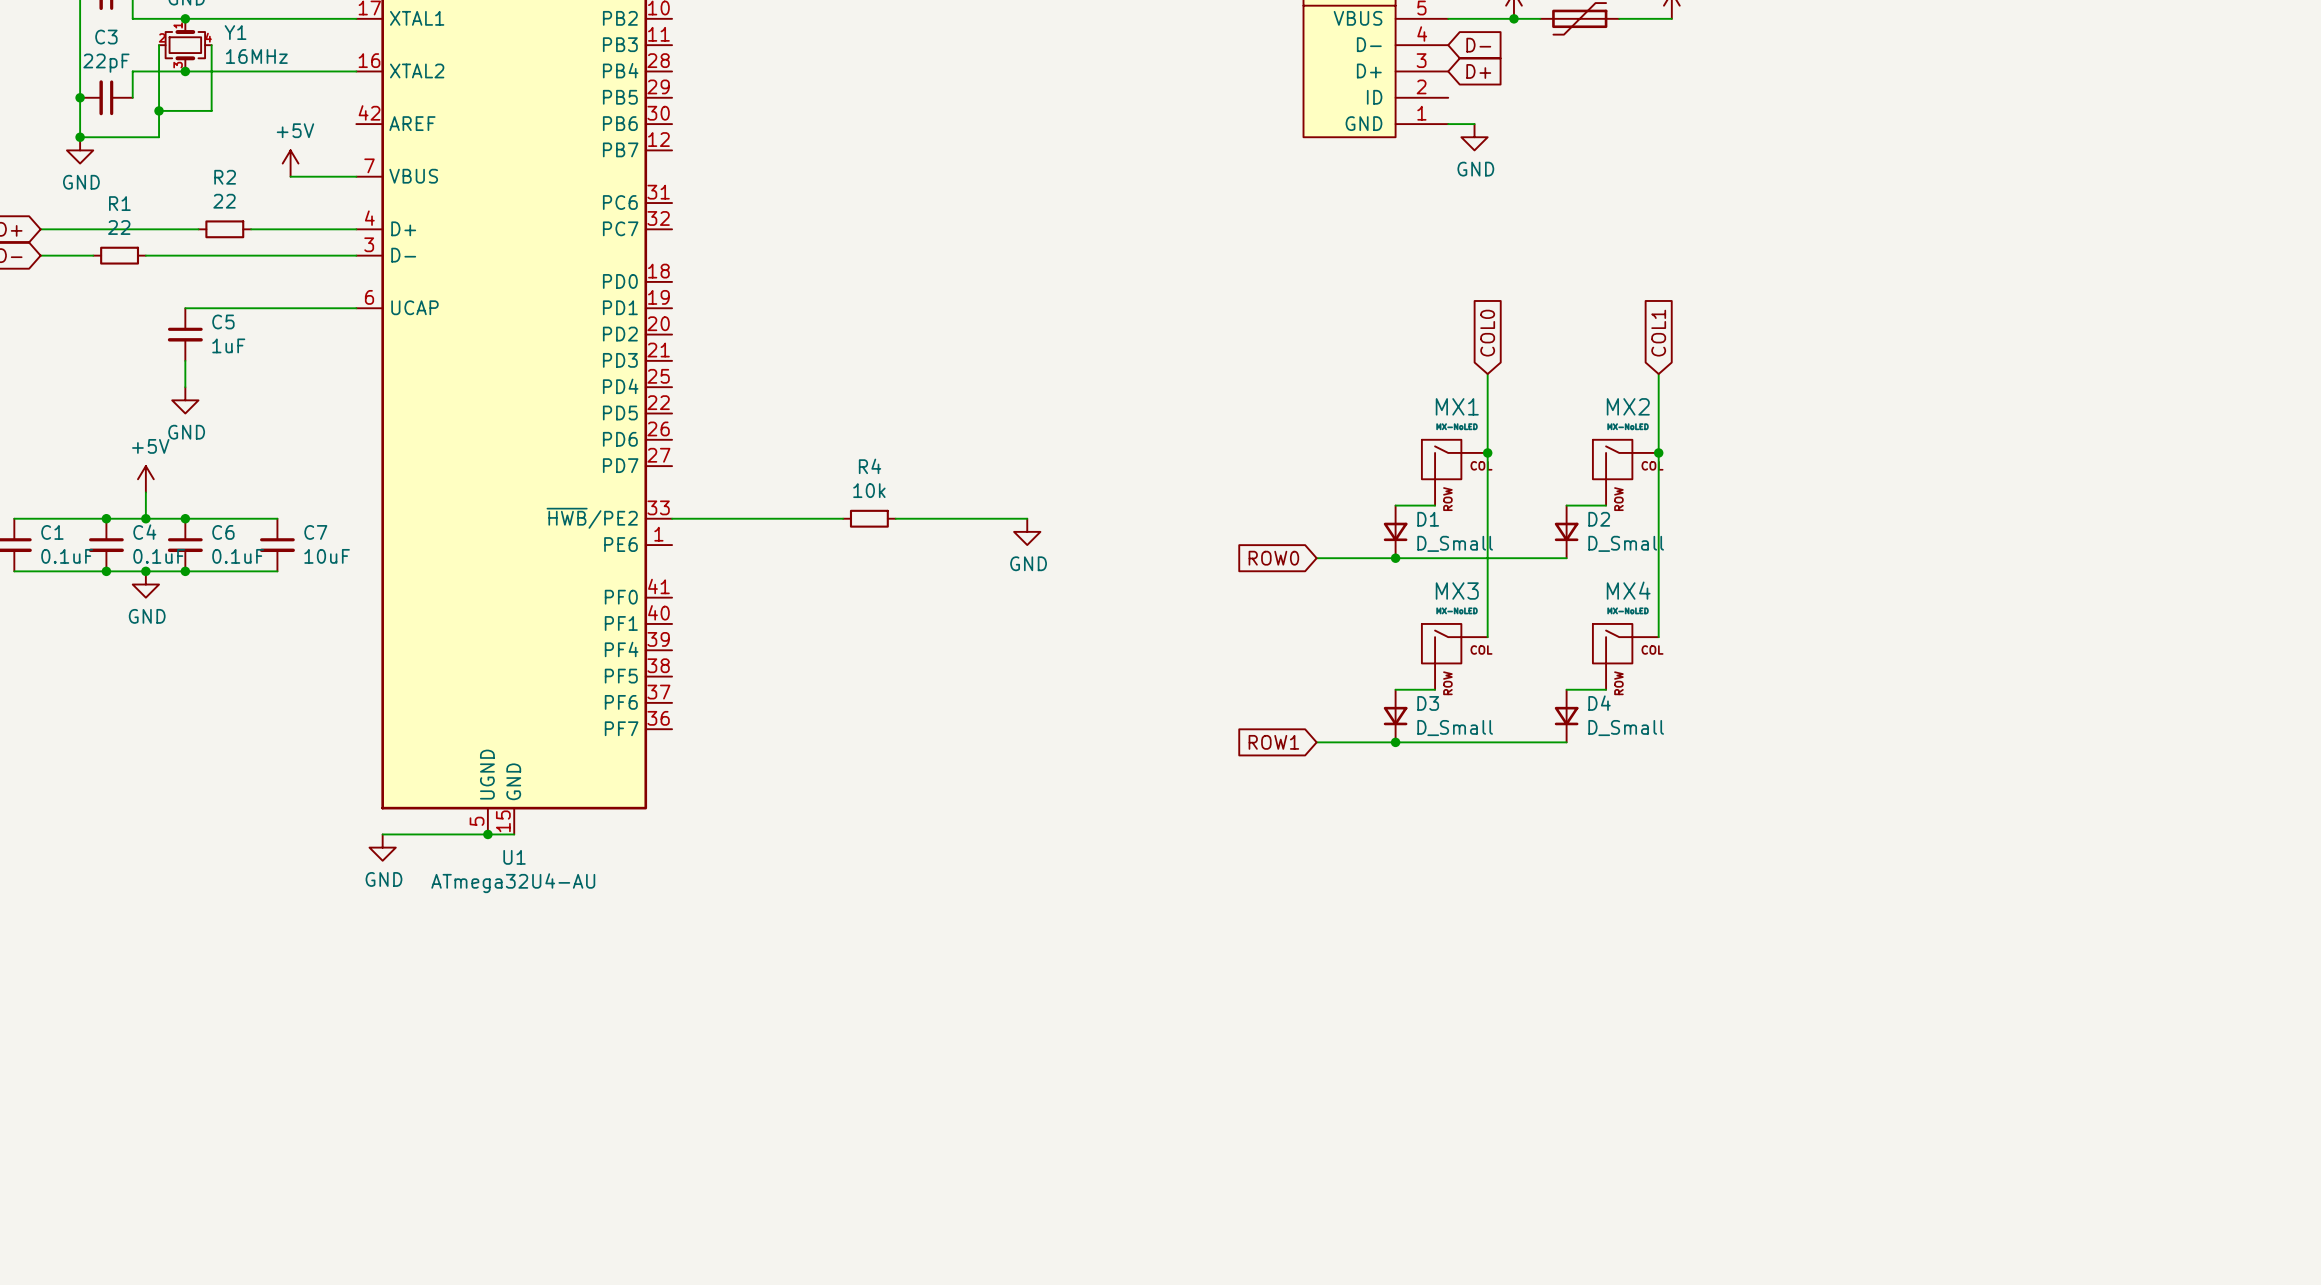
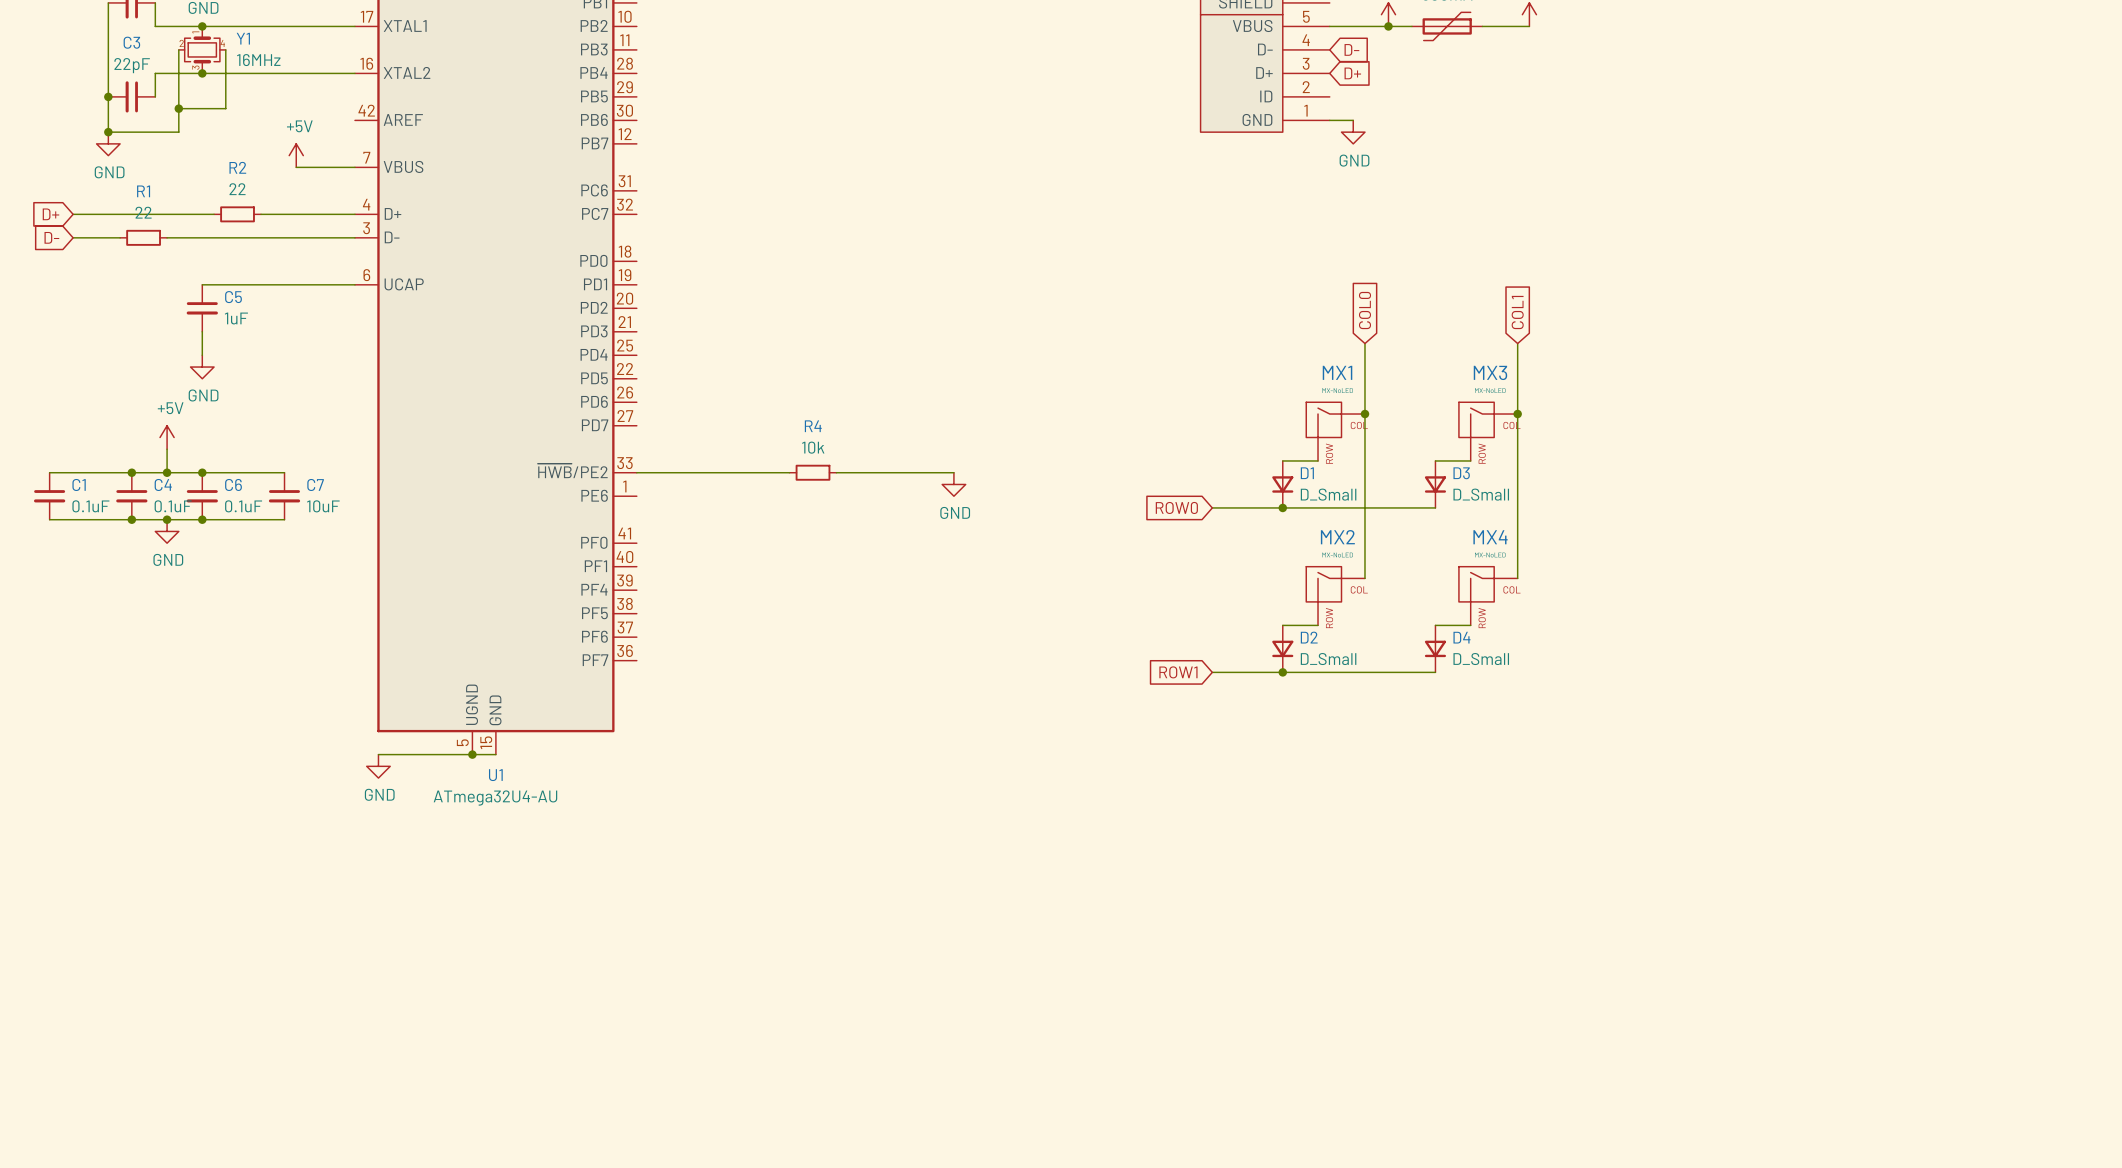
MX2 name: MX2 (1628, 406) -> MX3 (1490, 372)
D2 name: D2 (1599, 519) -> D3 (1461, 473)
MX3 name: MX3 (1457, 591) -> MX2 (1337, 537)
D3 name: D3 (1428, 703) -> D2 (1309, 637)

